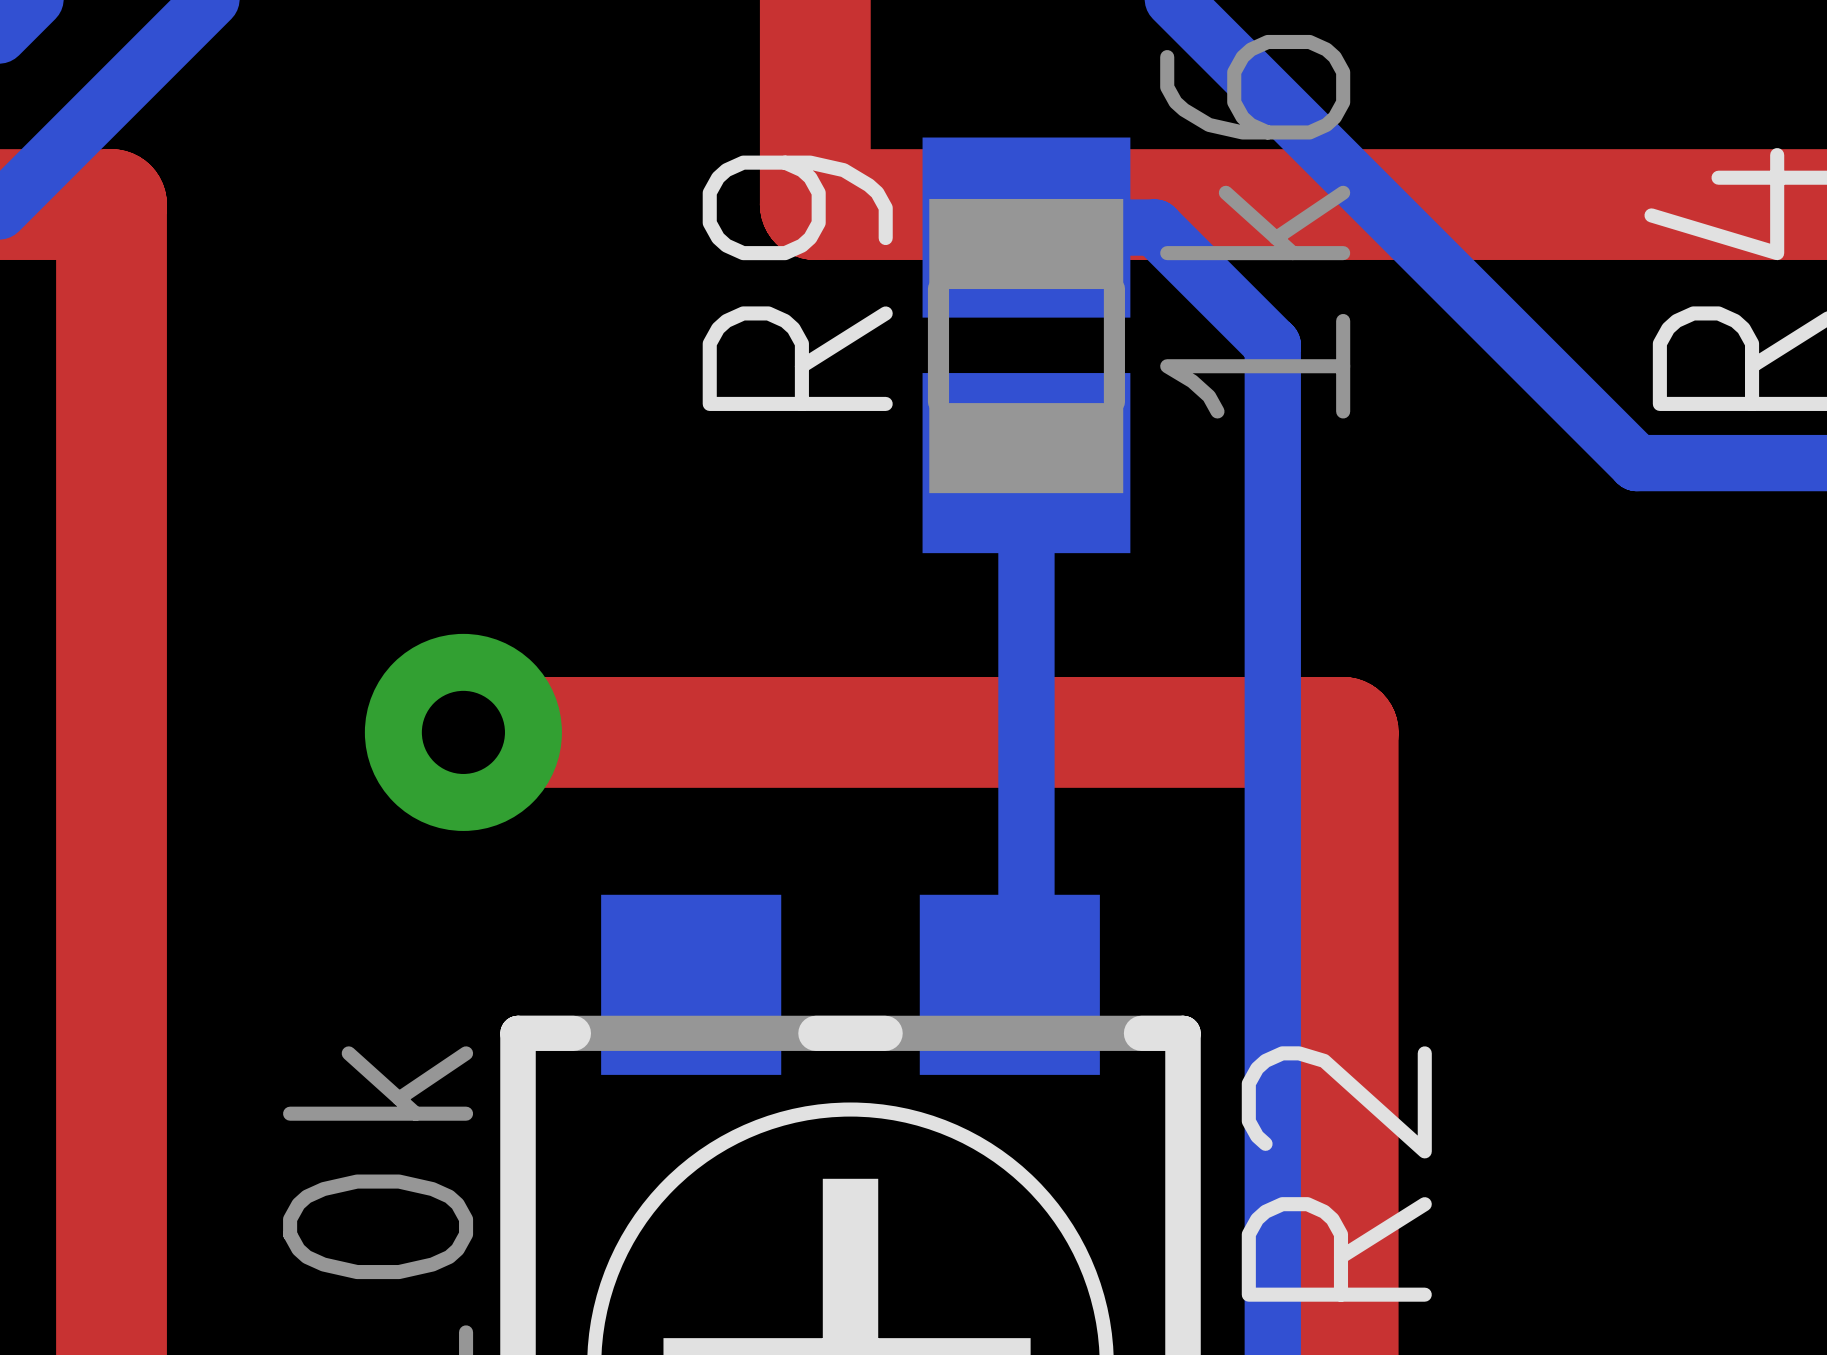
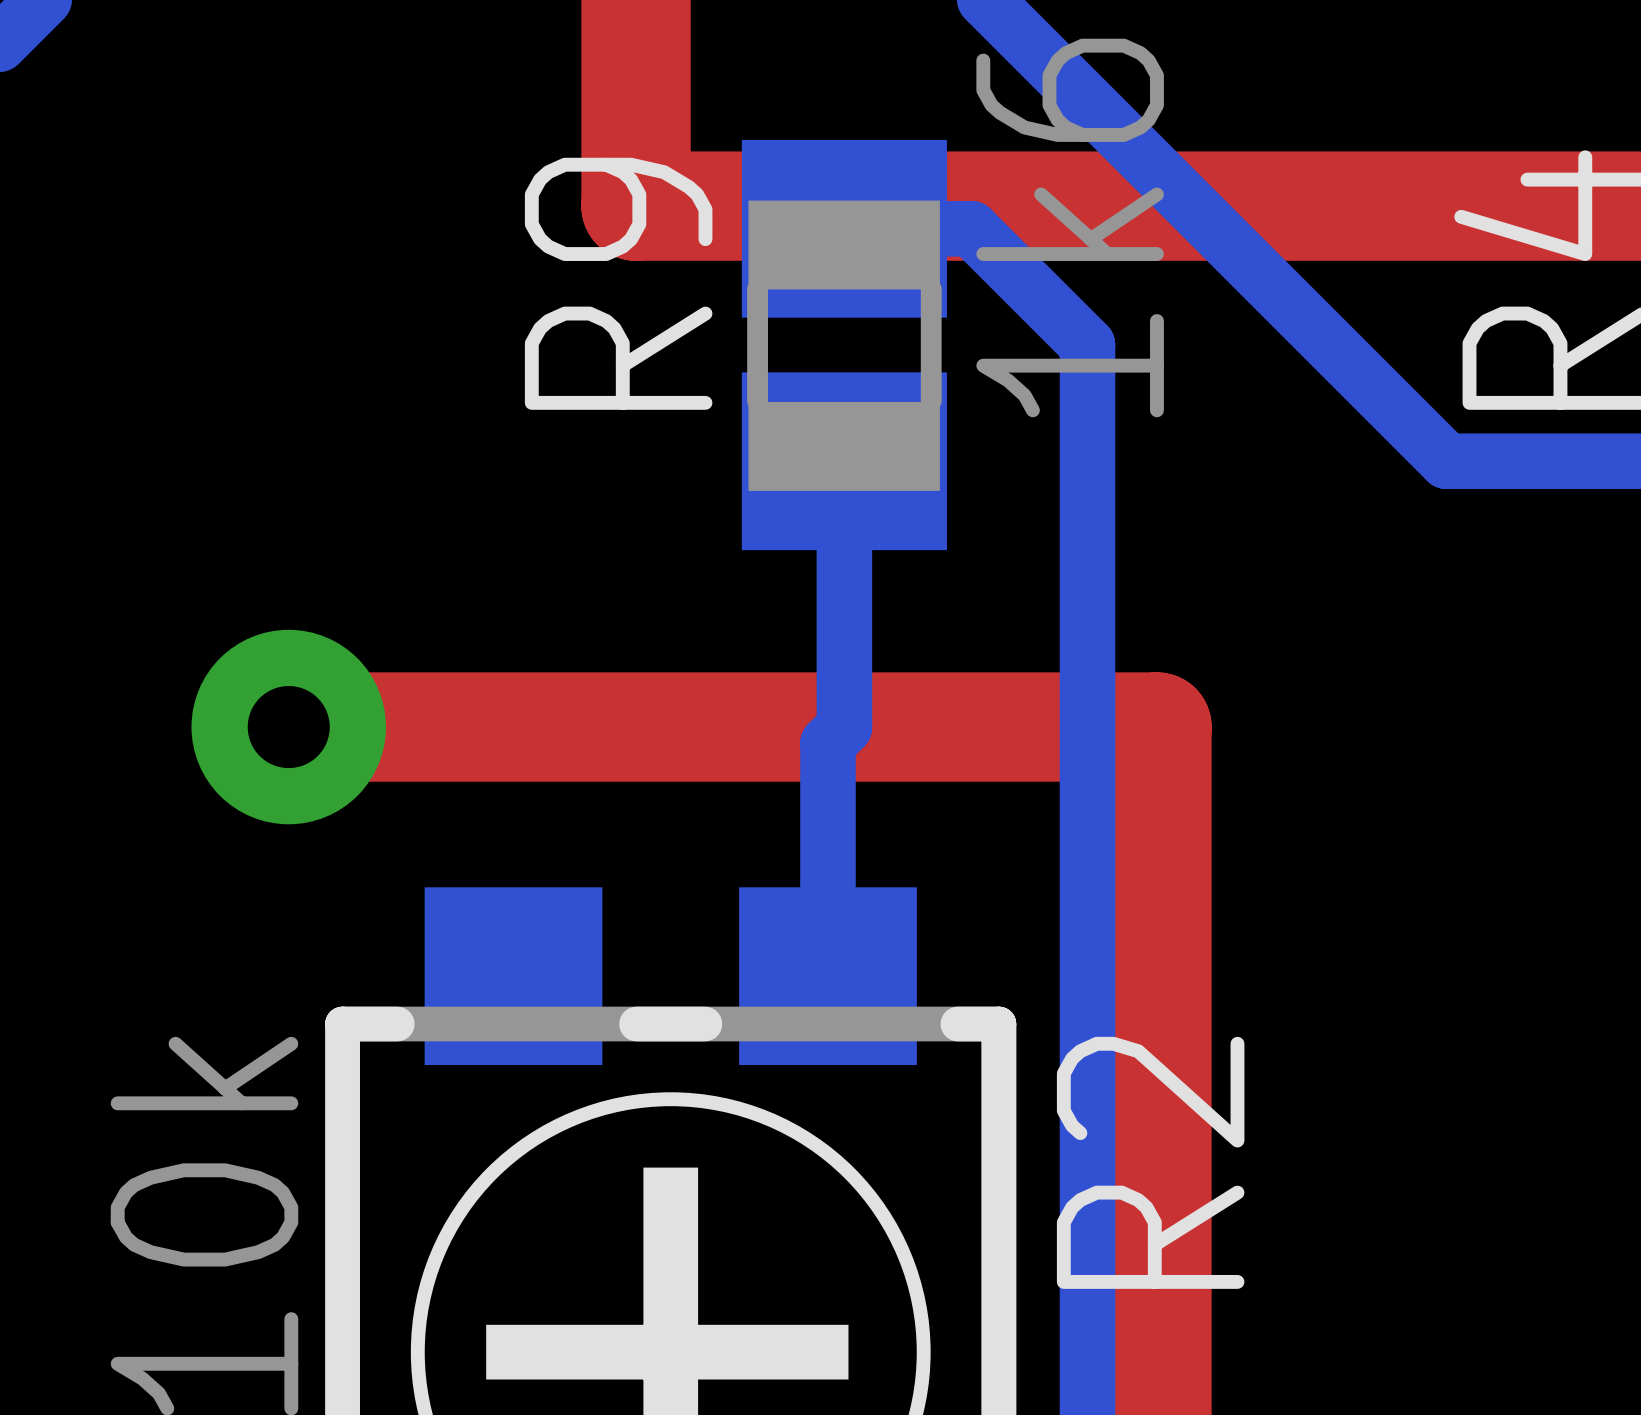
bottom track: (1026, 732) (1026, 943) (1009, 960) -> (844, 727) (827, 743) (827, 951)

